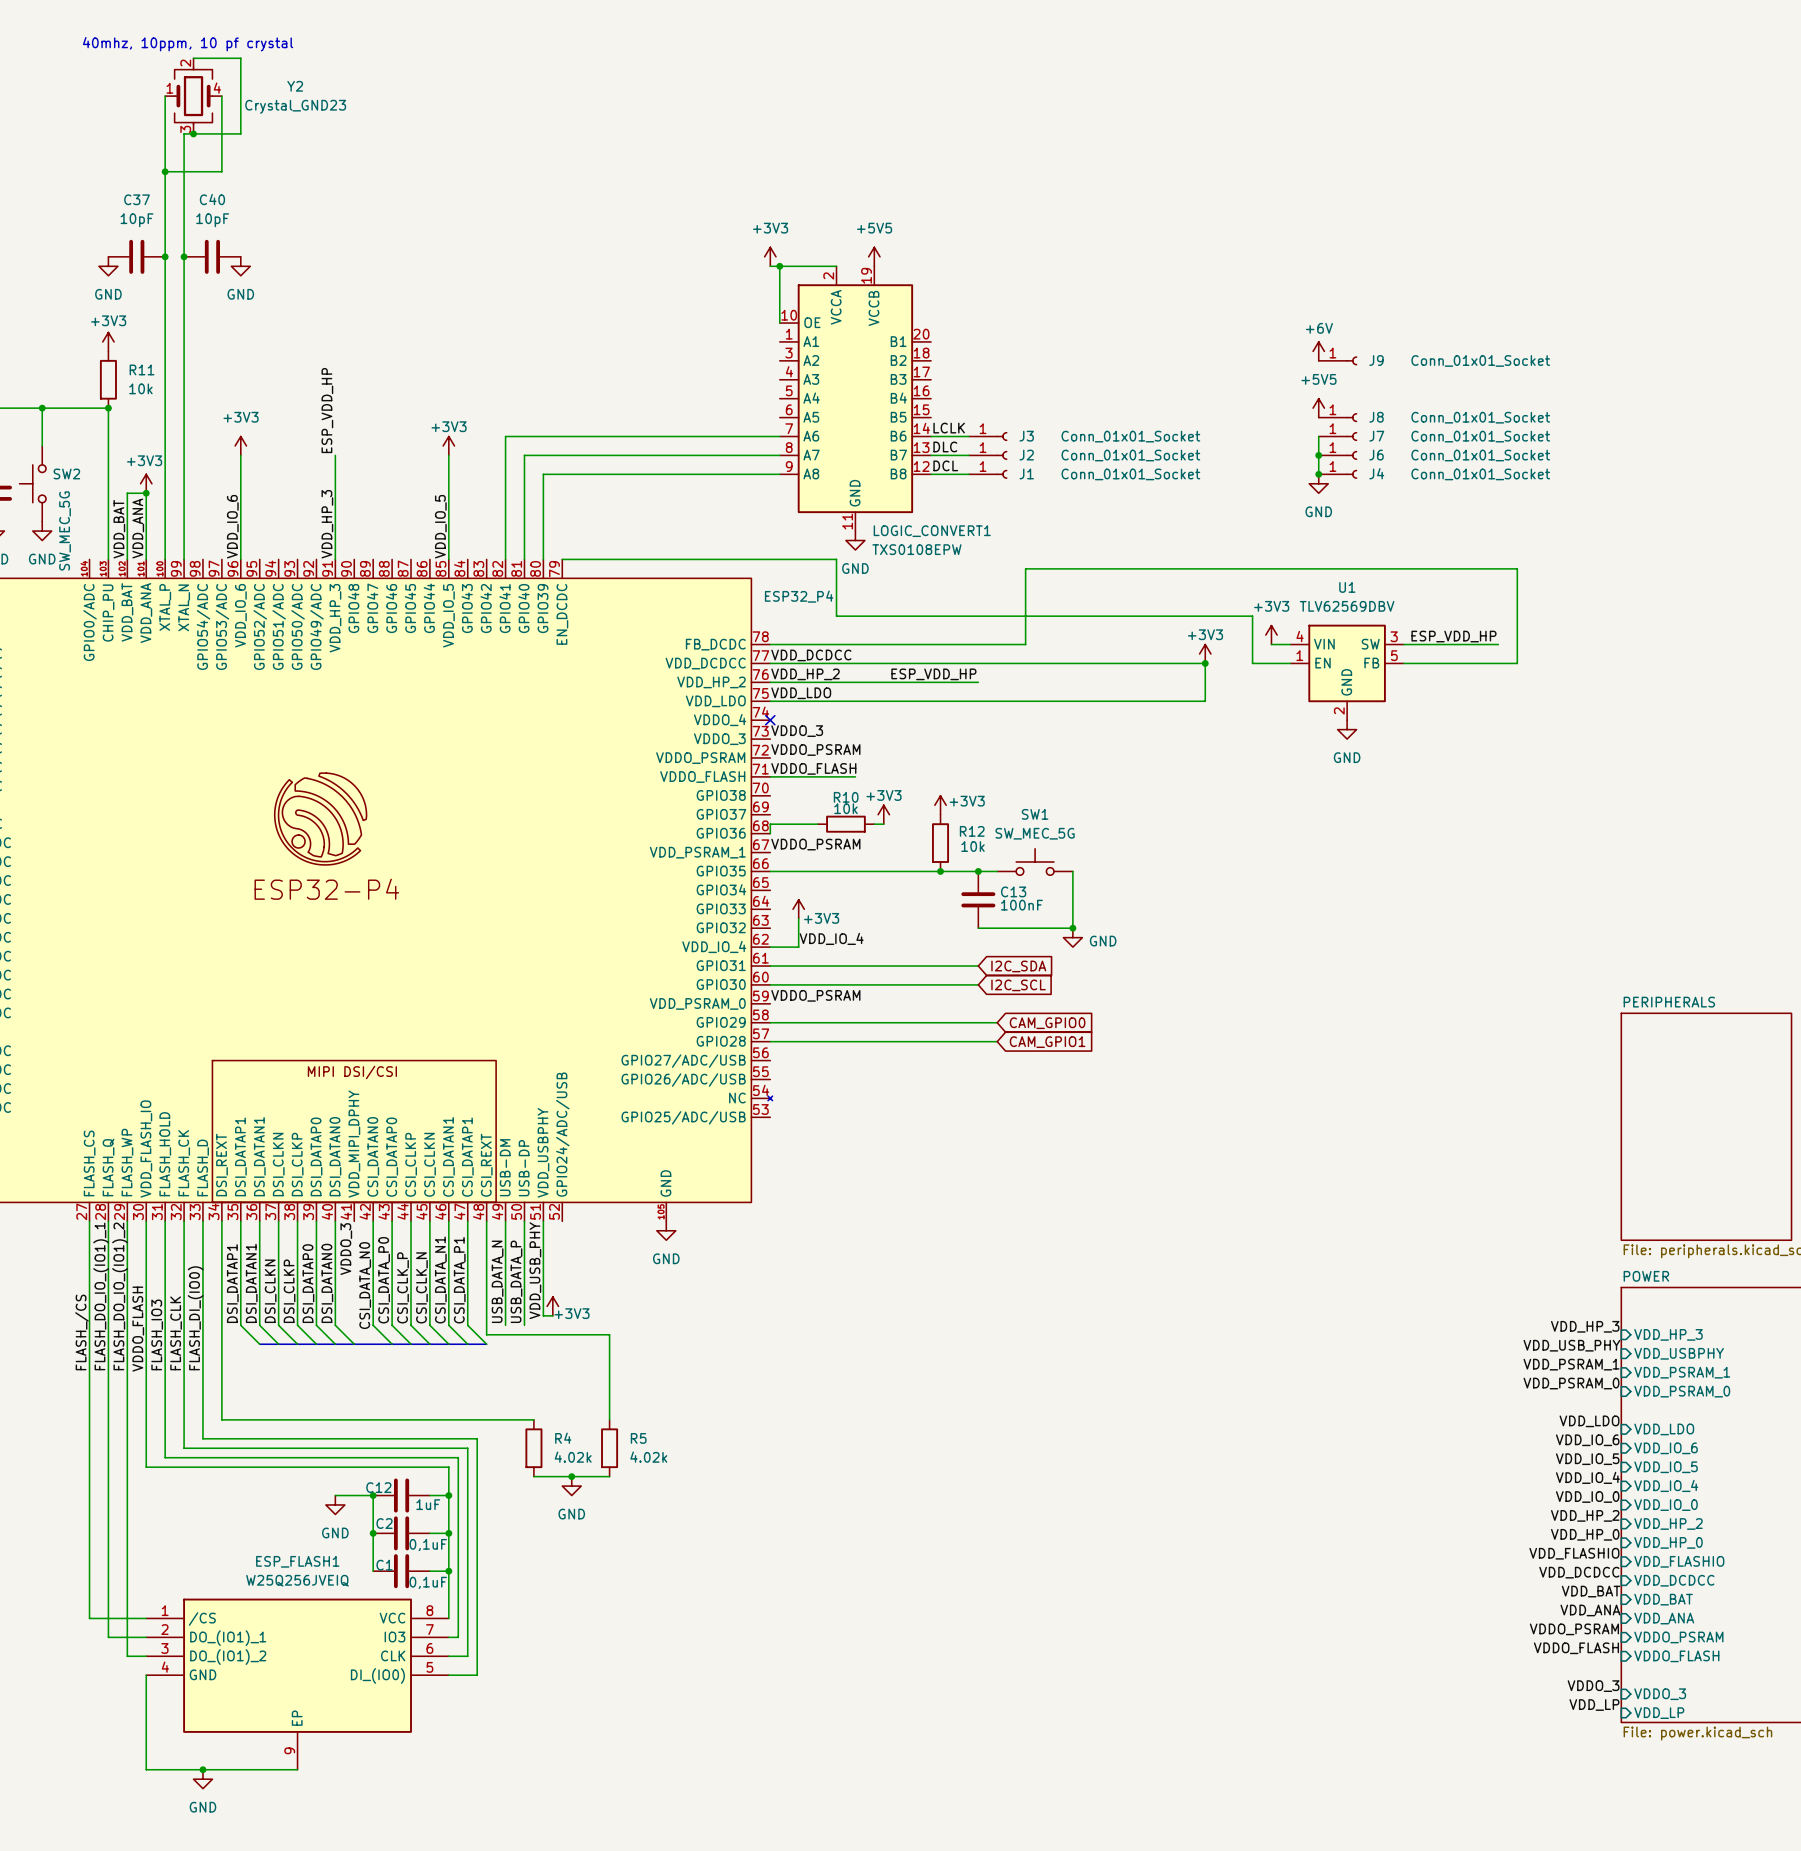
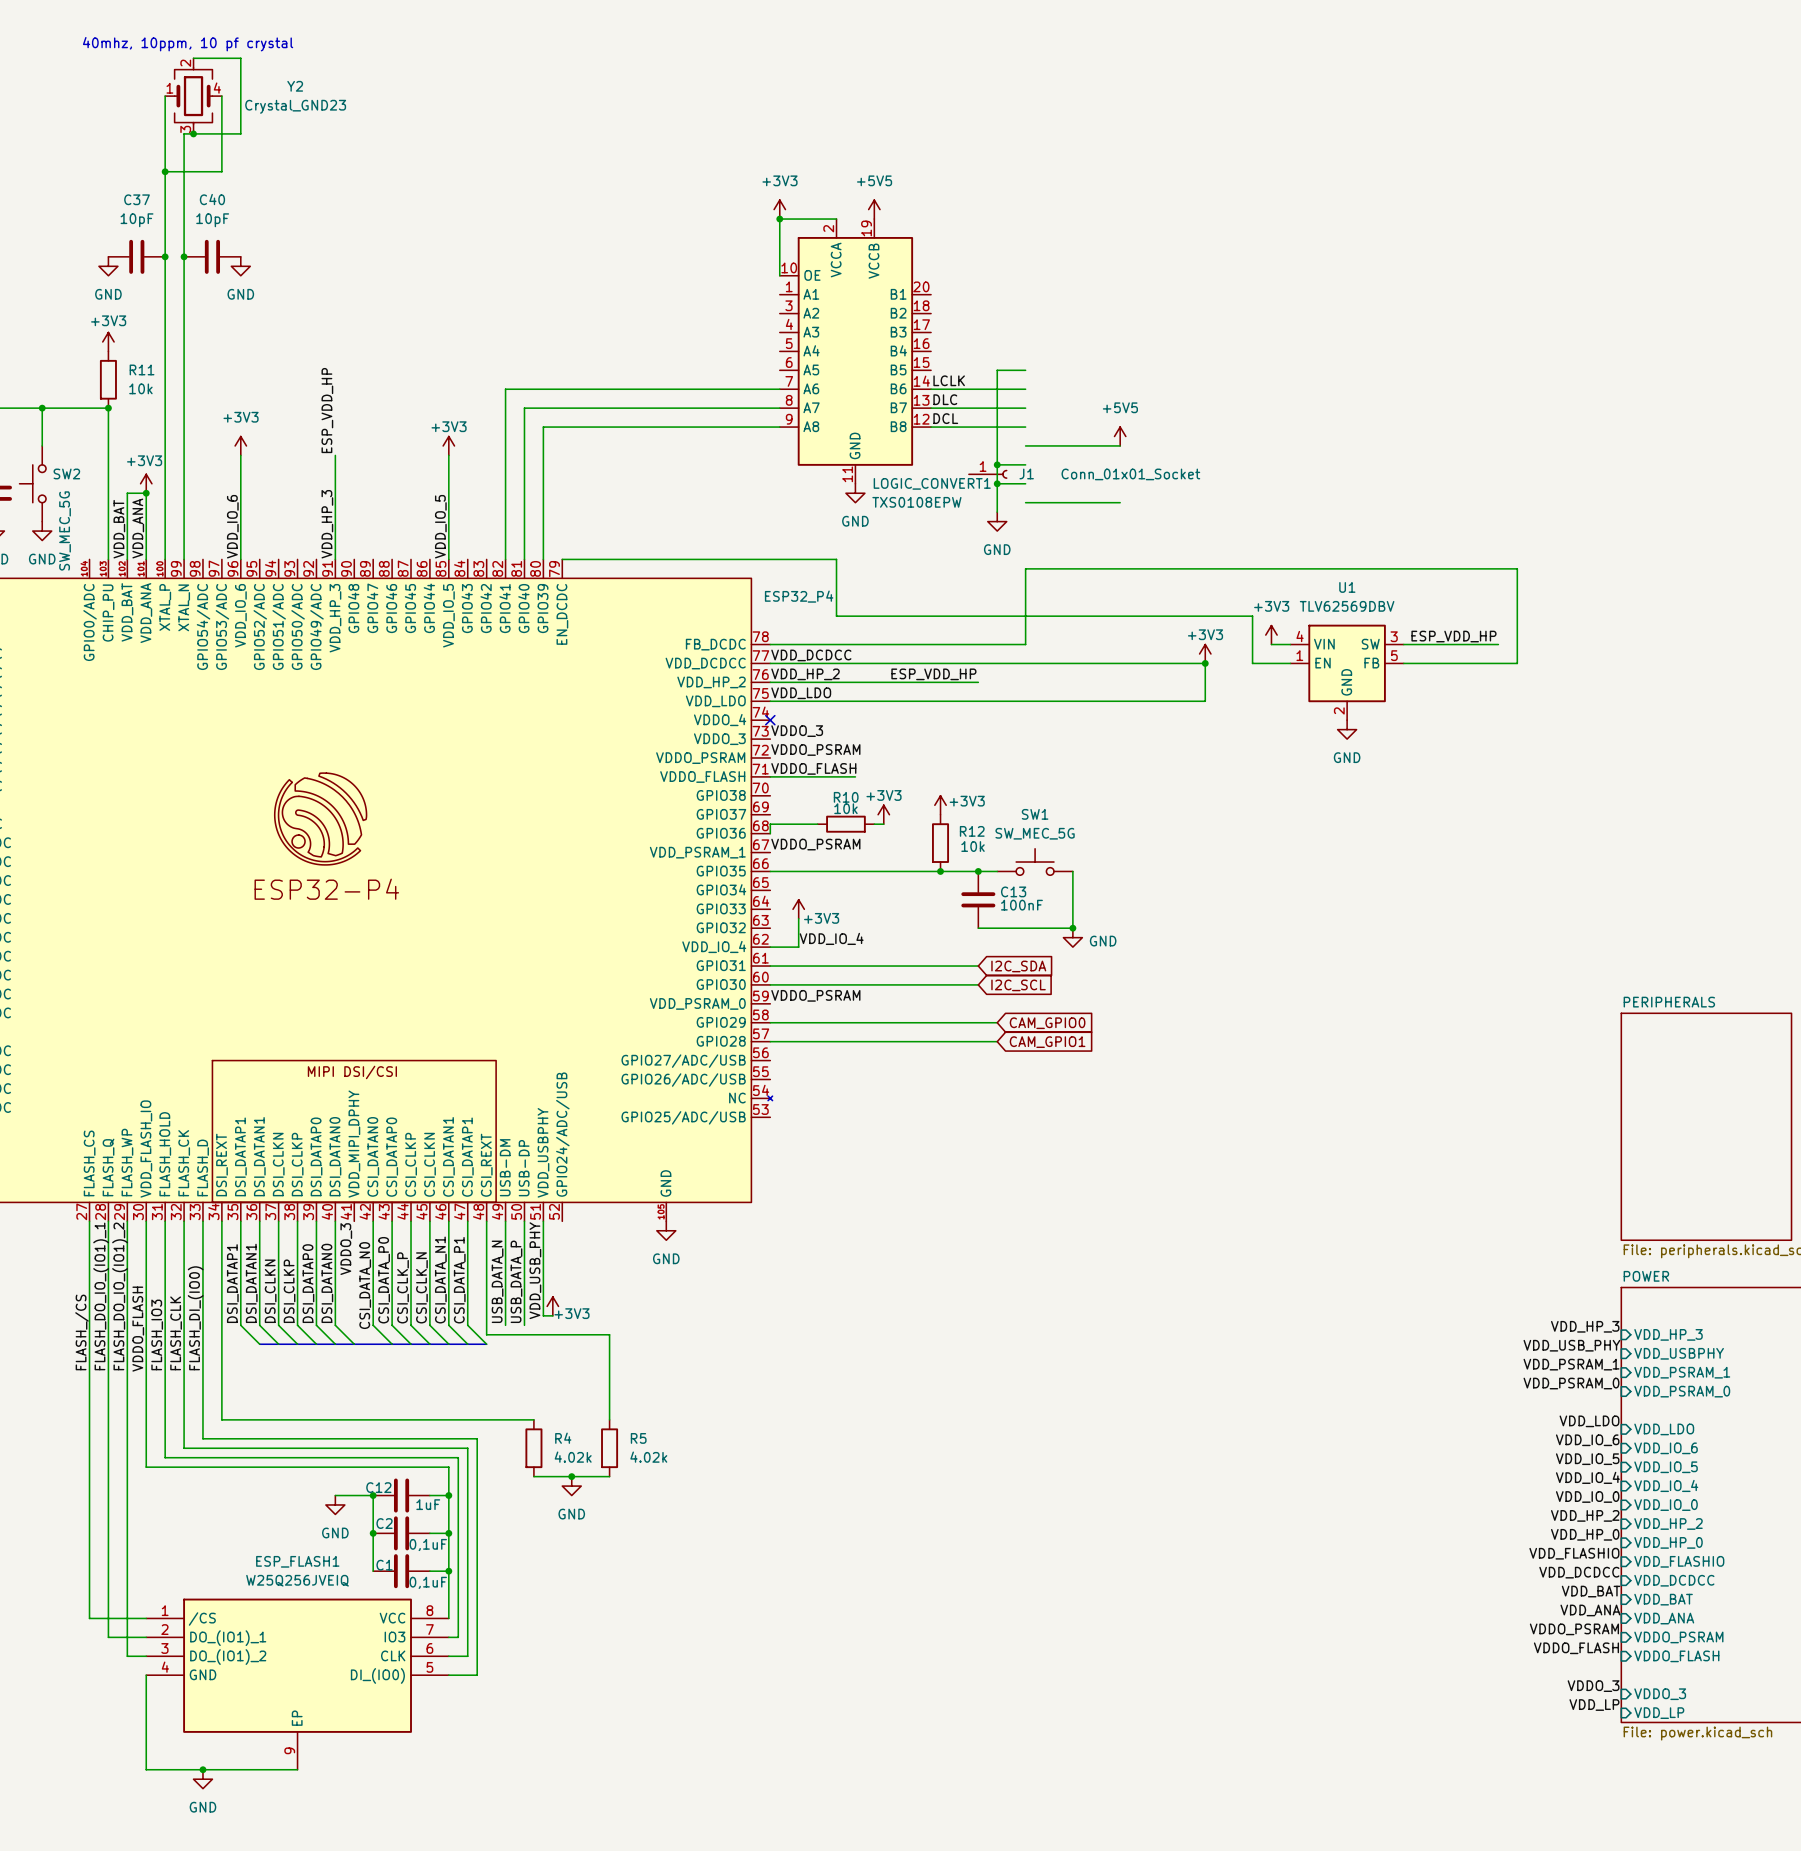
junction: none -> (779, 219)
wire: none -> (836, 219) (779, 219) (779, 266)
power symbol position: +3V3 (770, 256) -> +3V3 (779, 209)
power symbol position: +5V5 (874, 256) -> +5V5 (874, 209)
junction: (779, 266) -> none
wire: (779, 275) (779, 323) -> none
power symbol: +6V (1318, 351) -> none
J9: Conn_01x01_Socket (1337, 360) -> none
wire: none -> (1025, 370) (997, 370) (997, 512)
wire: none -> (931, 389) (1025, 389)
LOGIC_CONVERT1 position: (855, 398) -> (855, 351)
wire: none -> (931, 408) (1025, 408)
power symbol: +5V5 (1318, 408) -> none
J8: Conn_01x01_Socket (1337, 417) -> none
wire: none -> (931, 427) (1025, 427)
label position: LCLK (949, 428) -> LCLK (949, 380)
wire: (505, 436) (779, 436) -> (505, 436) (505, 389) (779, 389)
wire: (931, 436) (968, 436) -> none
J3: Conn_01x01_Socket (988, 436) -> none
power symbol: none -> +5V5 (1120, 436)
wire: (1318, 436) (1318, 474) -> none
J7: Conn_01x01_Socket (1337, 436) -> none
wire: none -> (1025, 445) (1120, 445)
label position: DLC (945, 446) -> DLC (945, 399)
wire: (524, 455) (779, 455) -> (524, 455) (524, 408) (779, 408)
wire: (931, 455) (968, 455) -> none
J2: Conn_01x01_Socket (988, 455) -> none
junction: (1318, 455) -> none
J6: Conn_01x01_Socket (1337, 455) -> none
wire: none -> (997, 464) (1025, 464)
junction: none -> (997, 464)
label position: DCL (945, 465) -> DCL (945, 418)
wire: (543, 474) (779, 474) -> (543, 474) (543, 427) (779, 427)
wire: (931, 474) (968, 474) -> none
junction: (1318, 474) -> none
J4: Conn_01x01_Socket (1337, 474) -> none
wire: none -> (997, 483) (1025, 483)
junction: none -> (997, 483)
power symbol: GND (1318, 483) -> none
wire: none -> (1025, 502) (1120, 502)
power symbol: none -> GND (997, 521)
power symbol position: GND (855, 540) -> GND (855, 493)

